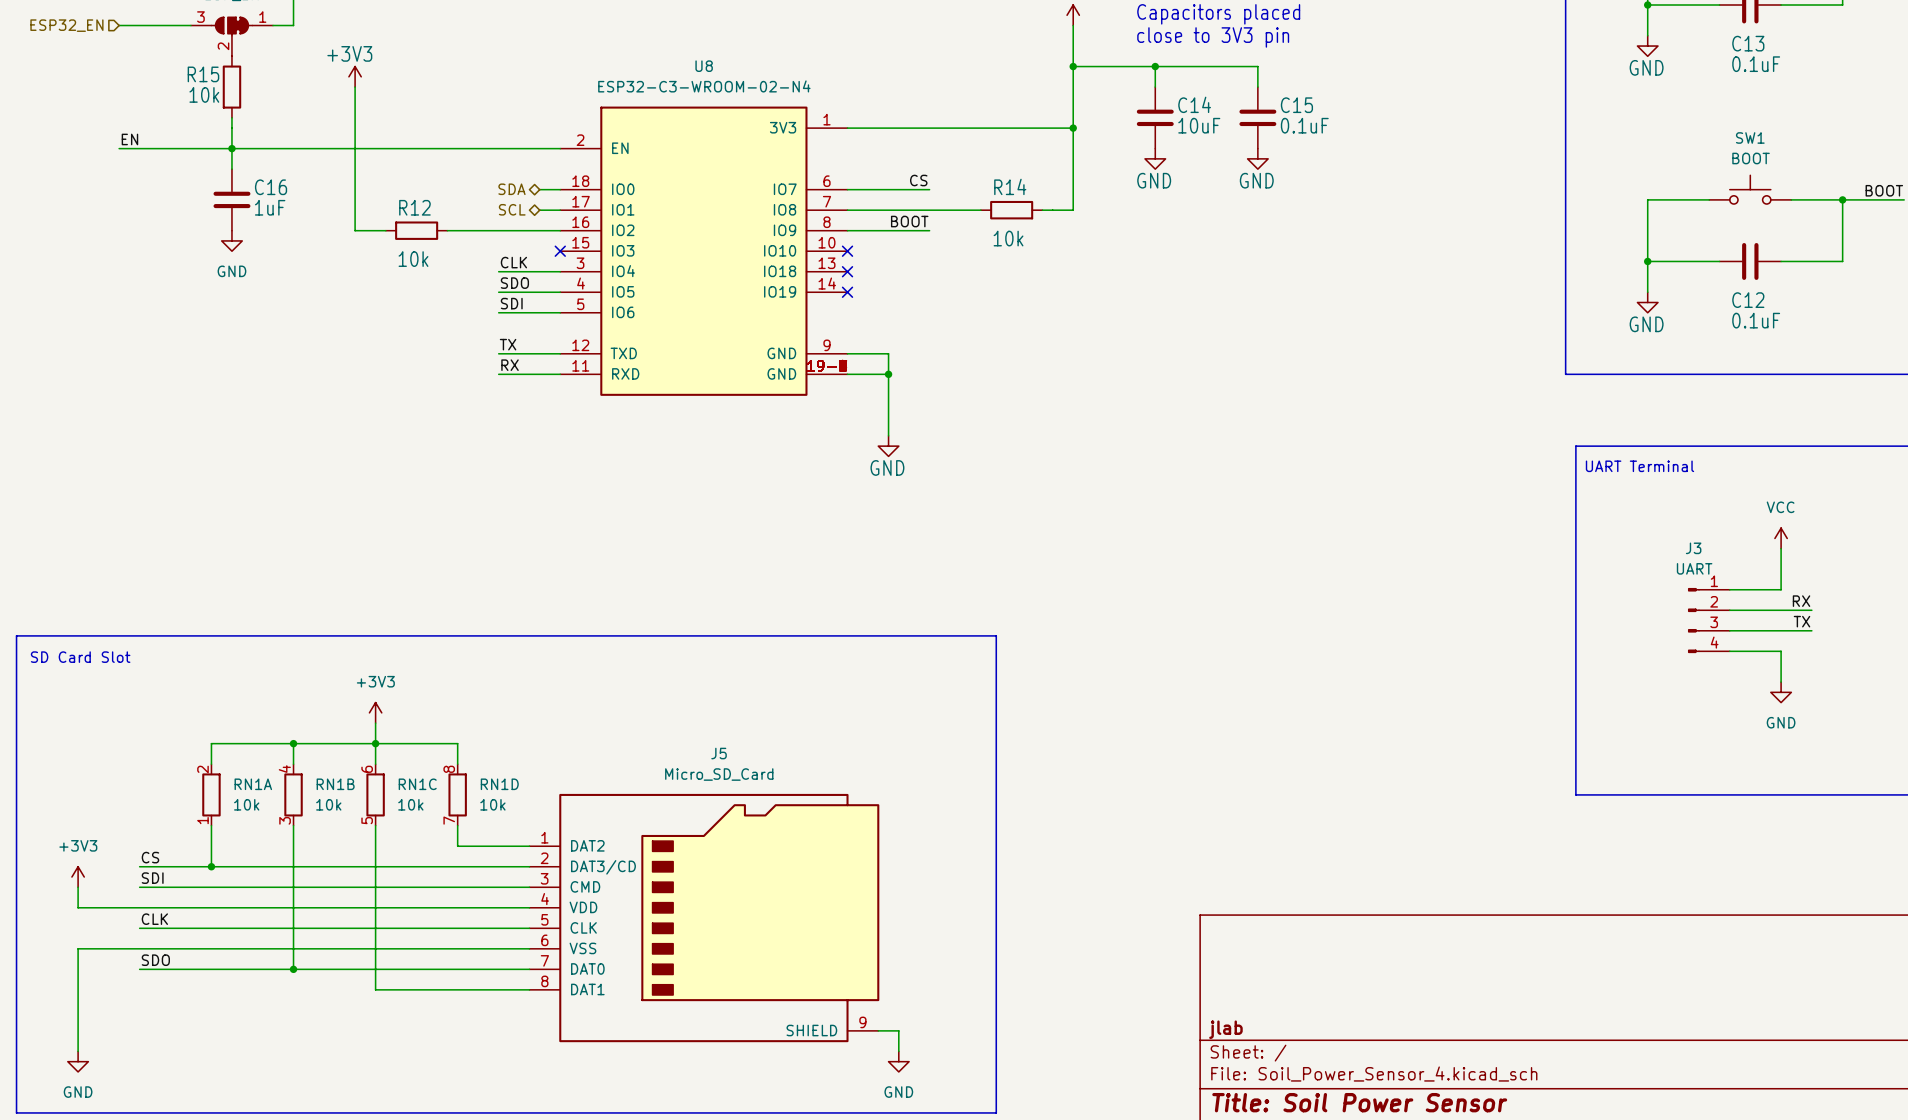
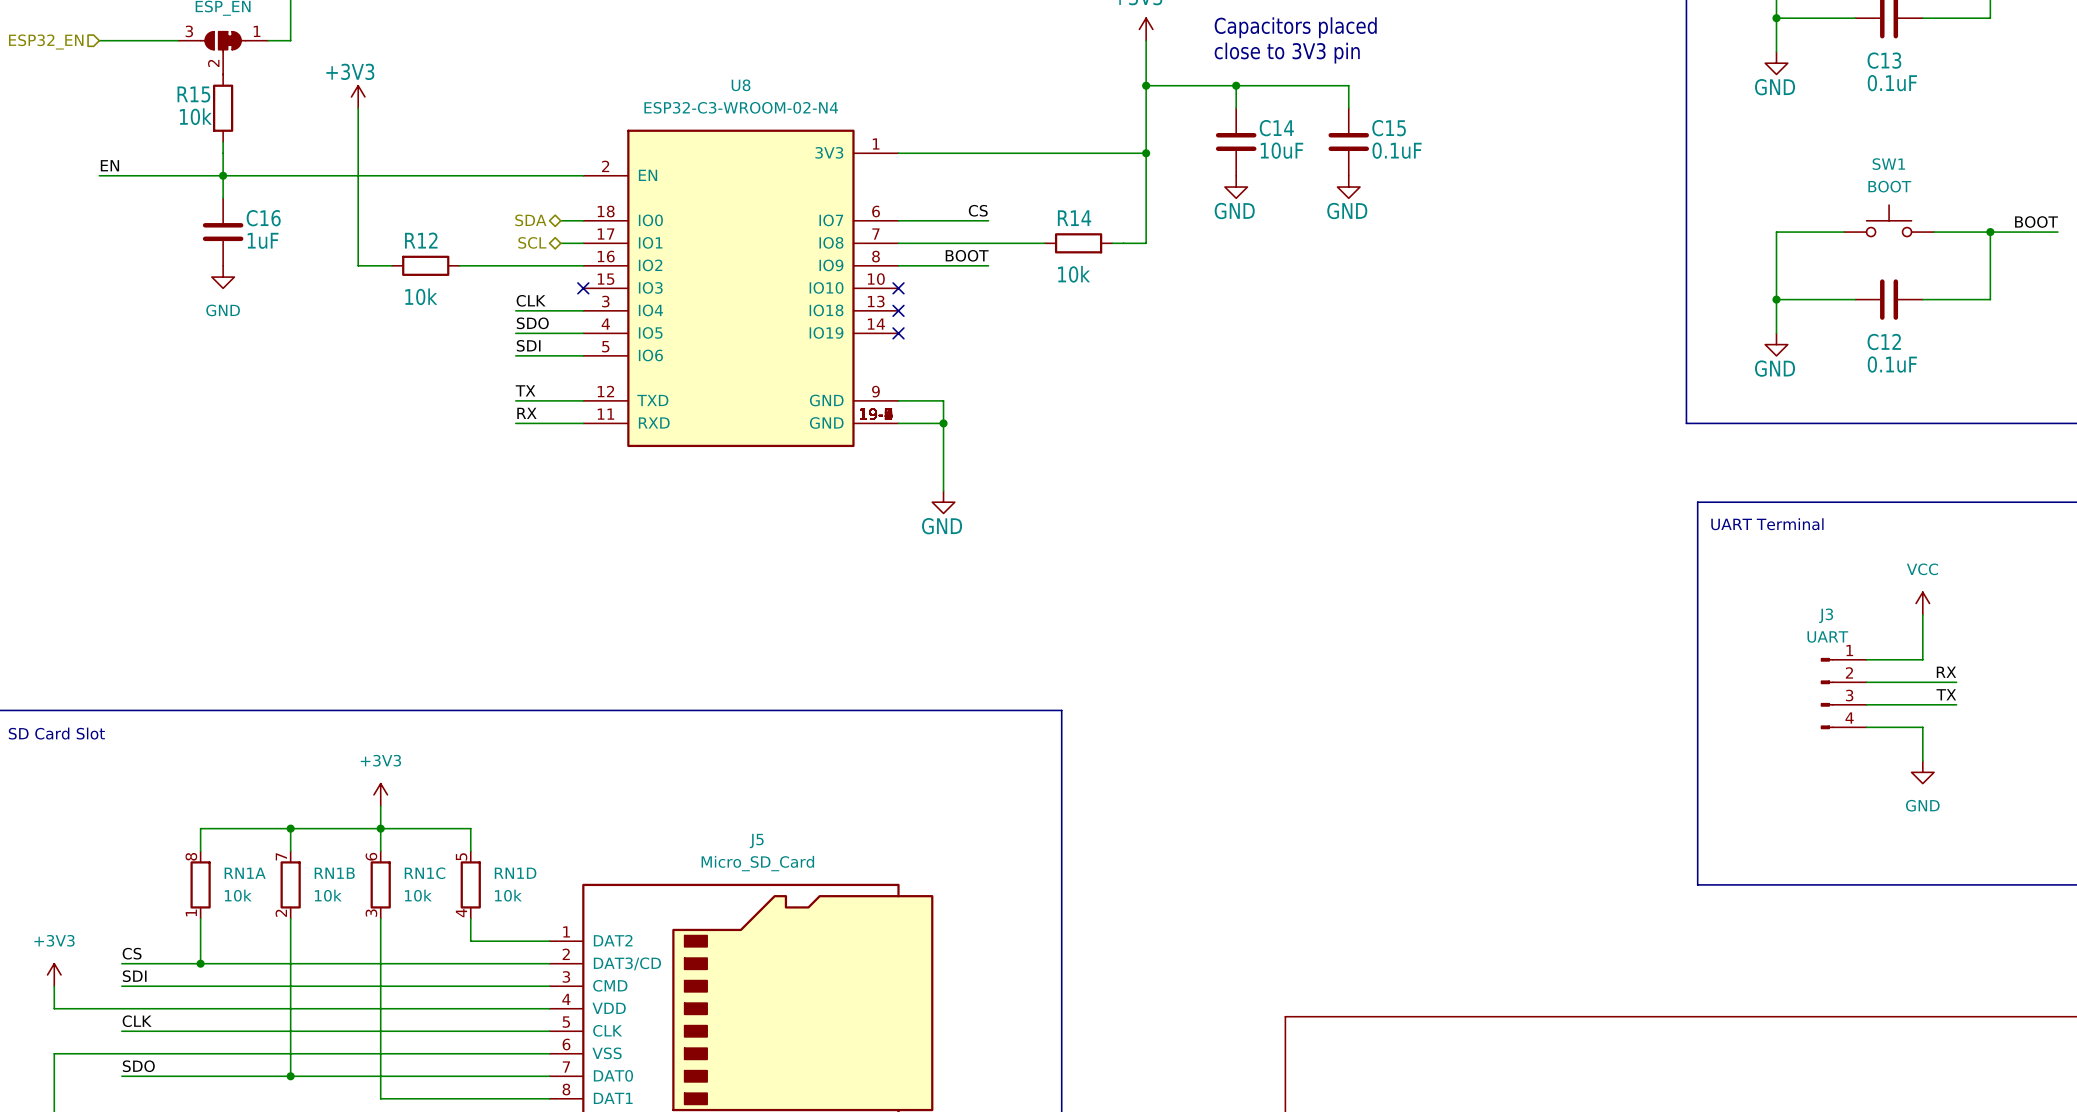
RN1A pin number: 2 (202, 769) -> 8 (191, 856)
RN1B pin number: 4 (284, 769) -> 7 (281, 856)
RN1D pin number: 8 (449, 769) -> 5 (461, 856)
RN1B pin number: 3 (285, 820) -> 2 (281, 913)
RN1C pin number: 5 (367, 820) -> 3 (371, 913)
RN1D pin number: 7 (449, 820) -> 4 (461, 913)

